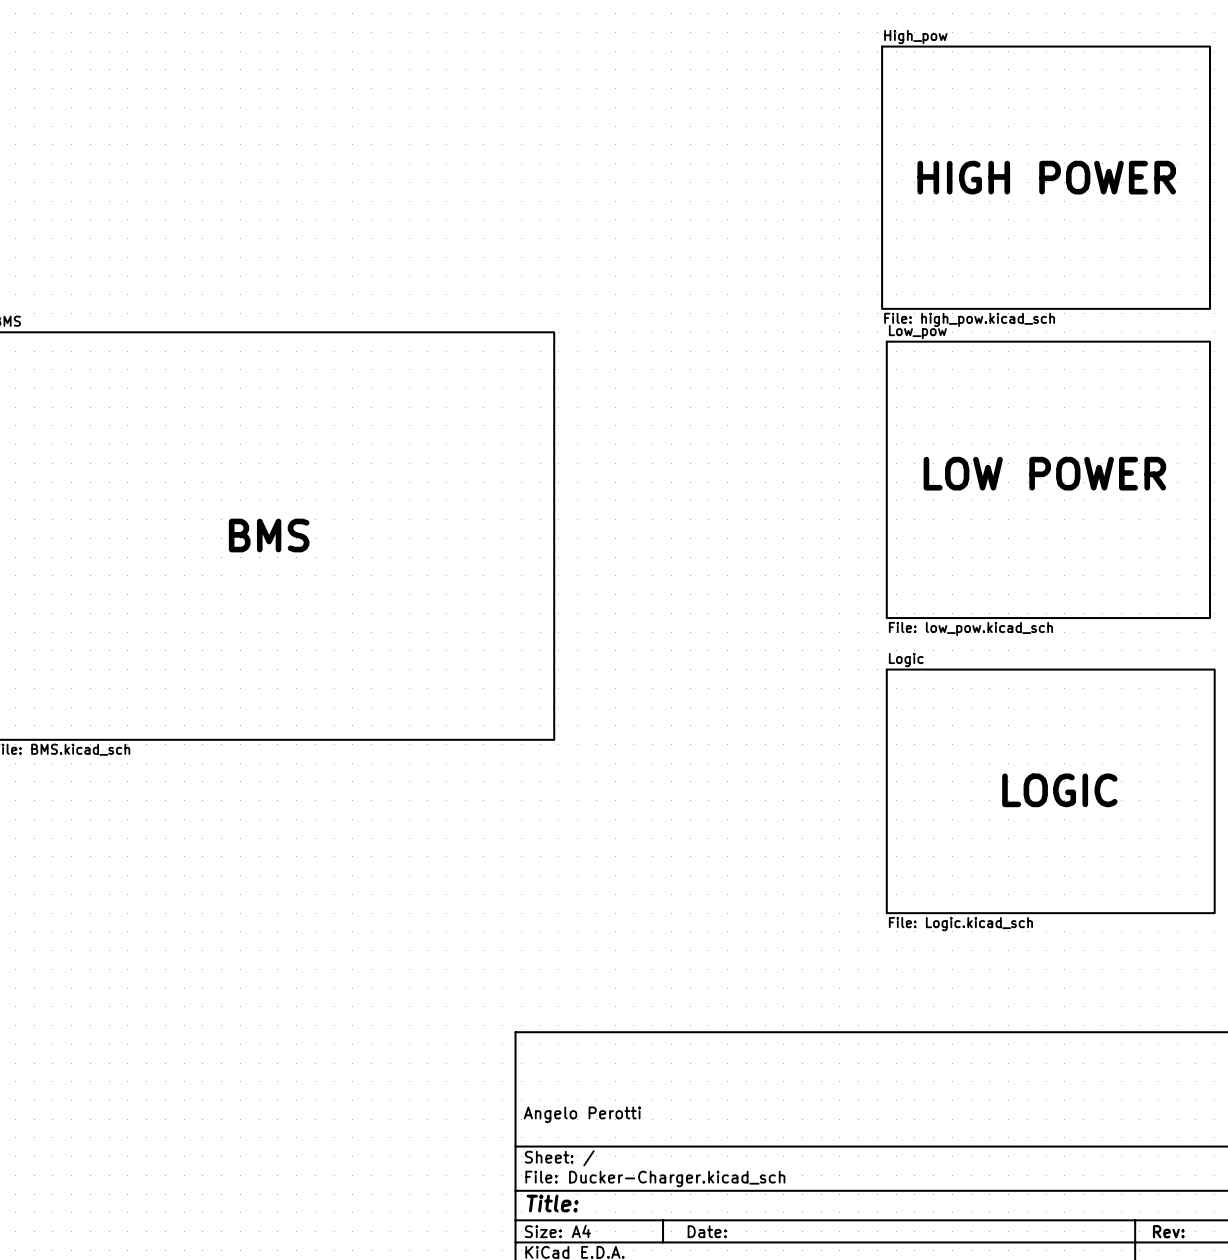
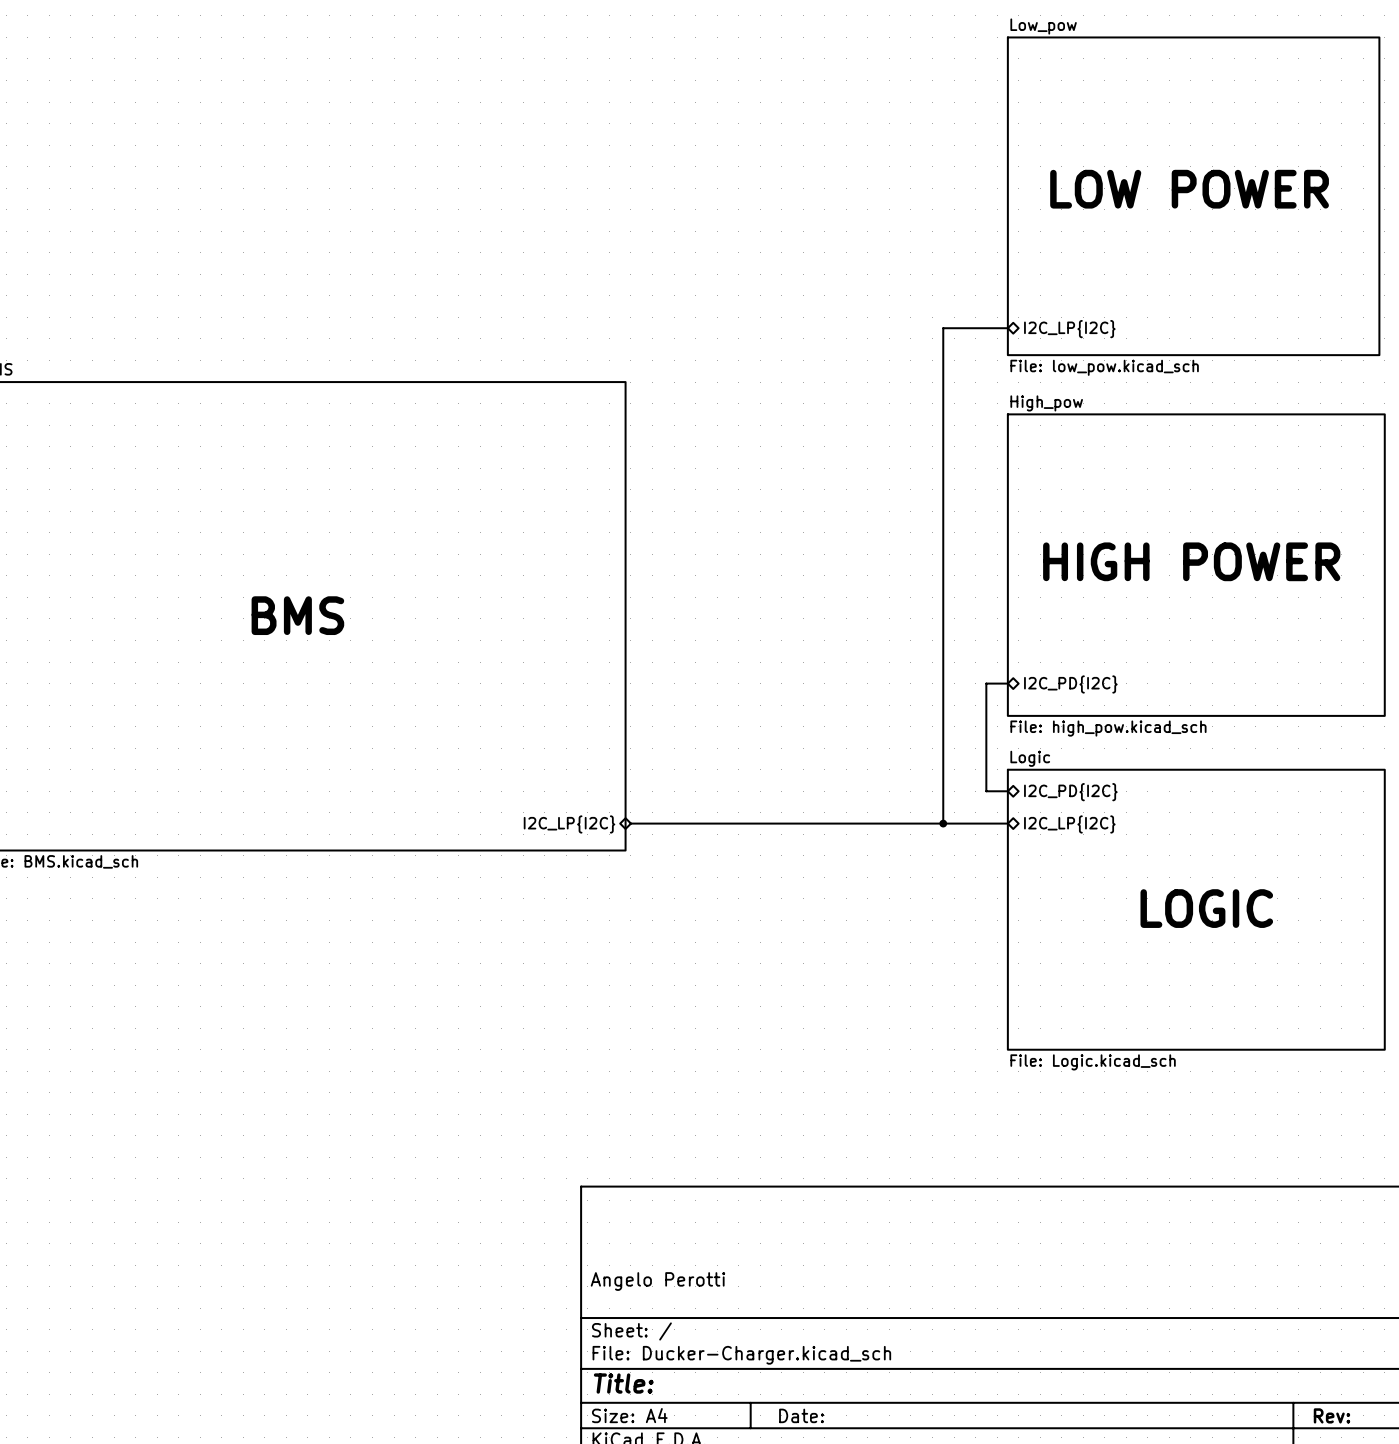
sheet Low_pow: none -> File: low_pow.kicad_sch (1193, 196)
text: HIGH POWER (1046, 177) -> LOW POWER (1189, 189)
sheet High_pow: File: high_pow.kicad_sch (1046, 177) -> none
bus: none -> (1007, 328) (943, 328) (943, 823)
sheet pin: none -> I2C_LP{I2C} (1069, 329)
text: LOW POWER (1044, 473) -> HIGH POWER (1191, 561)
sheet Low_pow: File: low_pow.kicad_sch (1048, 479) -> none
sheet High_pow: none -> File: high_pow.kicad_sch (1196, 565)
bus: none -> (1007, 683) (986, 683) (986, 791) (1007, 791)
sheet pin: none -> I2C_PD{I2C} (1070, 684)
sheet pin: none -> I2C_PD{I2C} (1070, 792)
bus: none -> (630, 823) (1007, 823)
junction: none -> (943, 823)
sheet pin: none -> I2C_LP{I2C} (569, 824)
sheet pin: none -> I2C_LP{I2C} (1069, 824)

